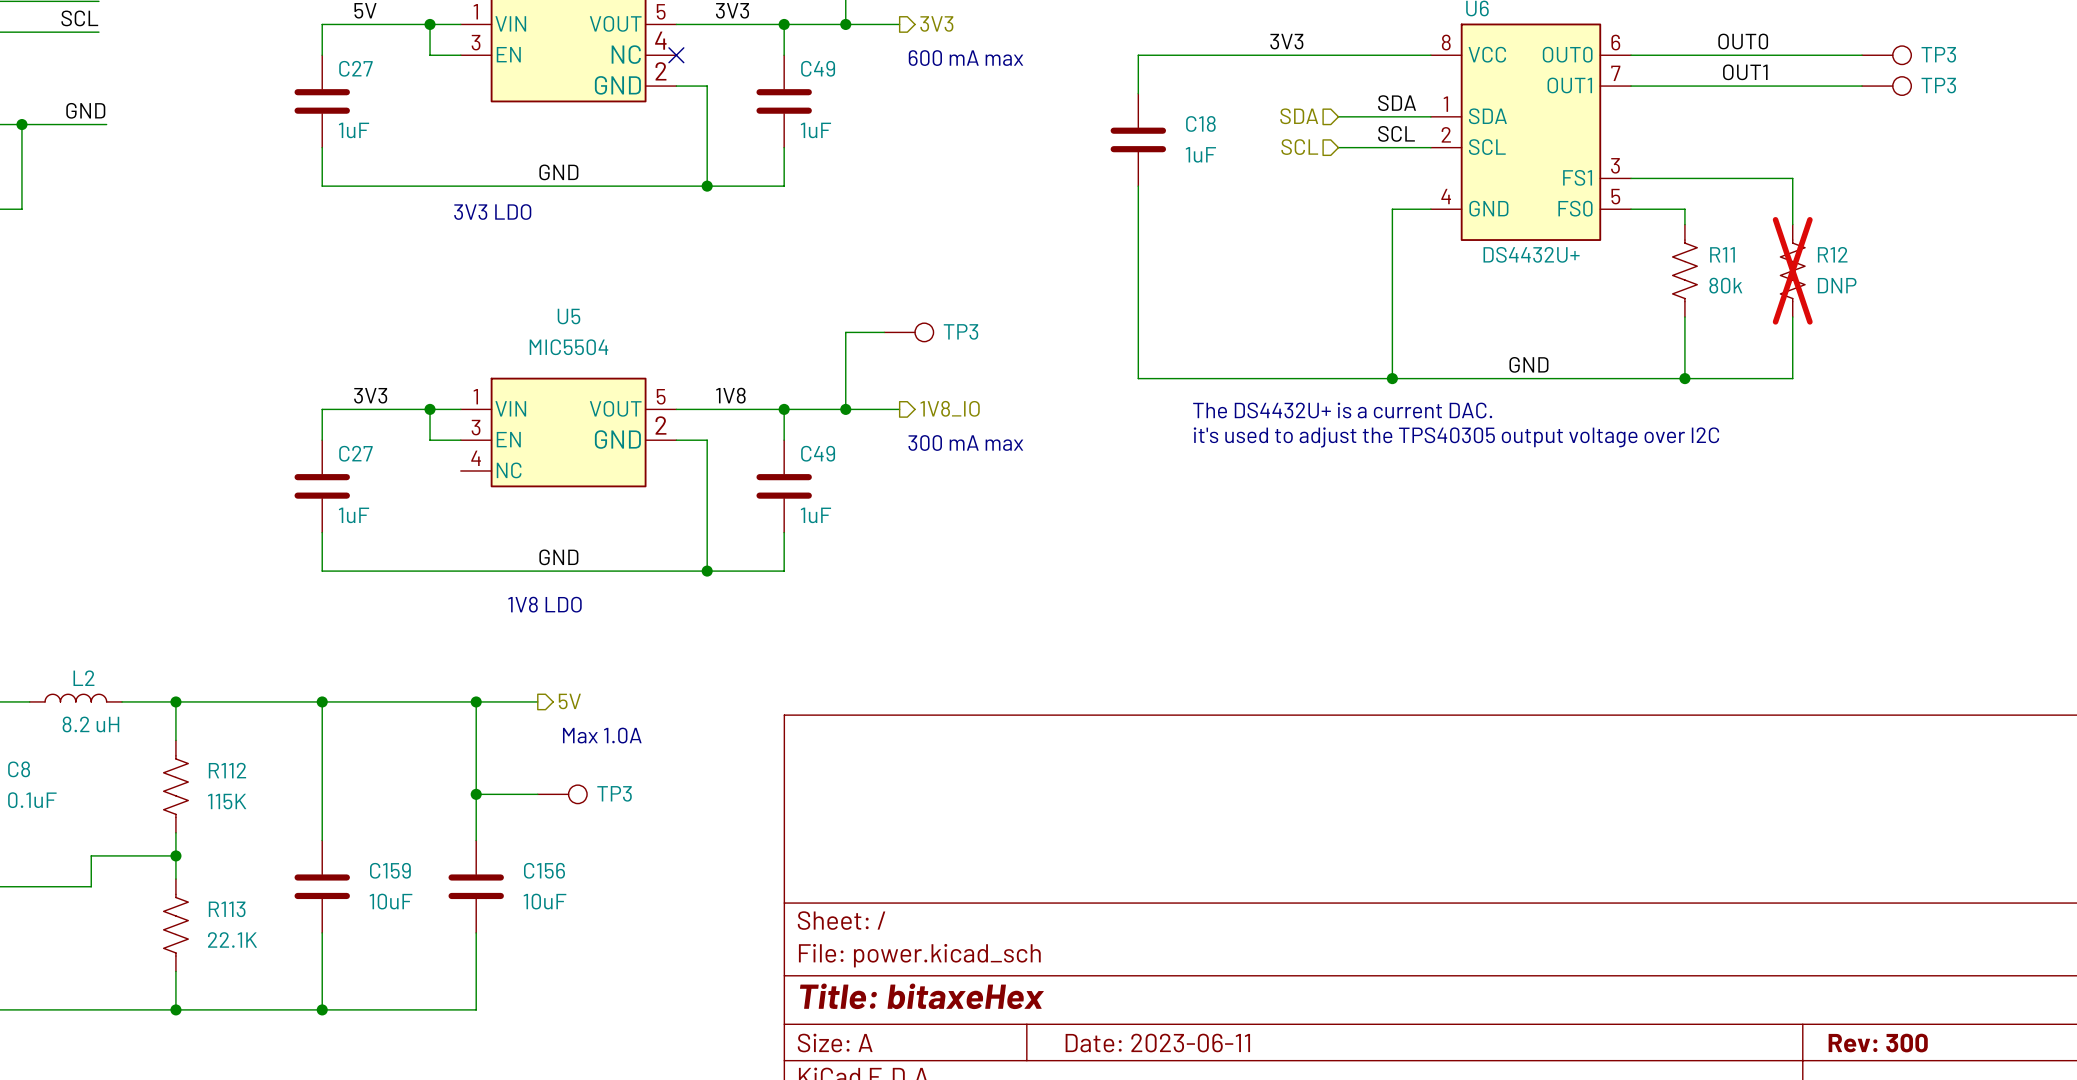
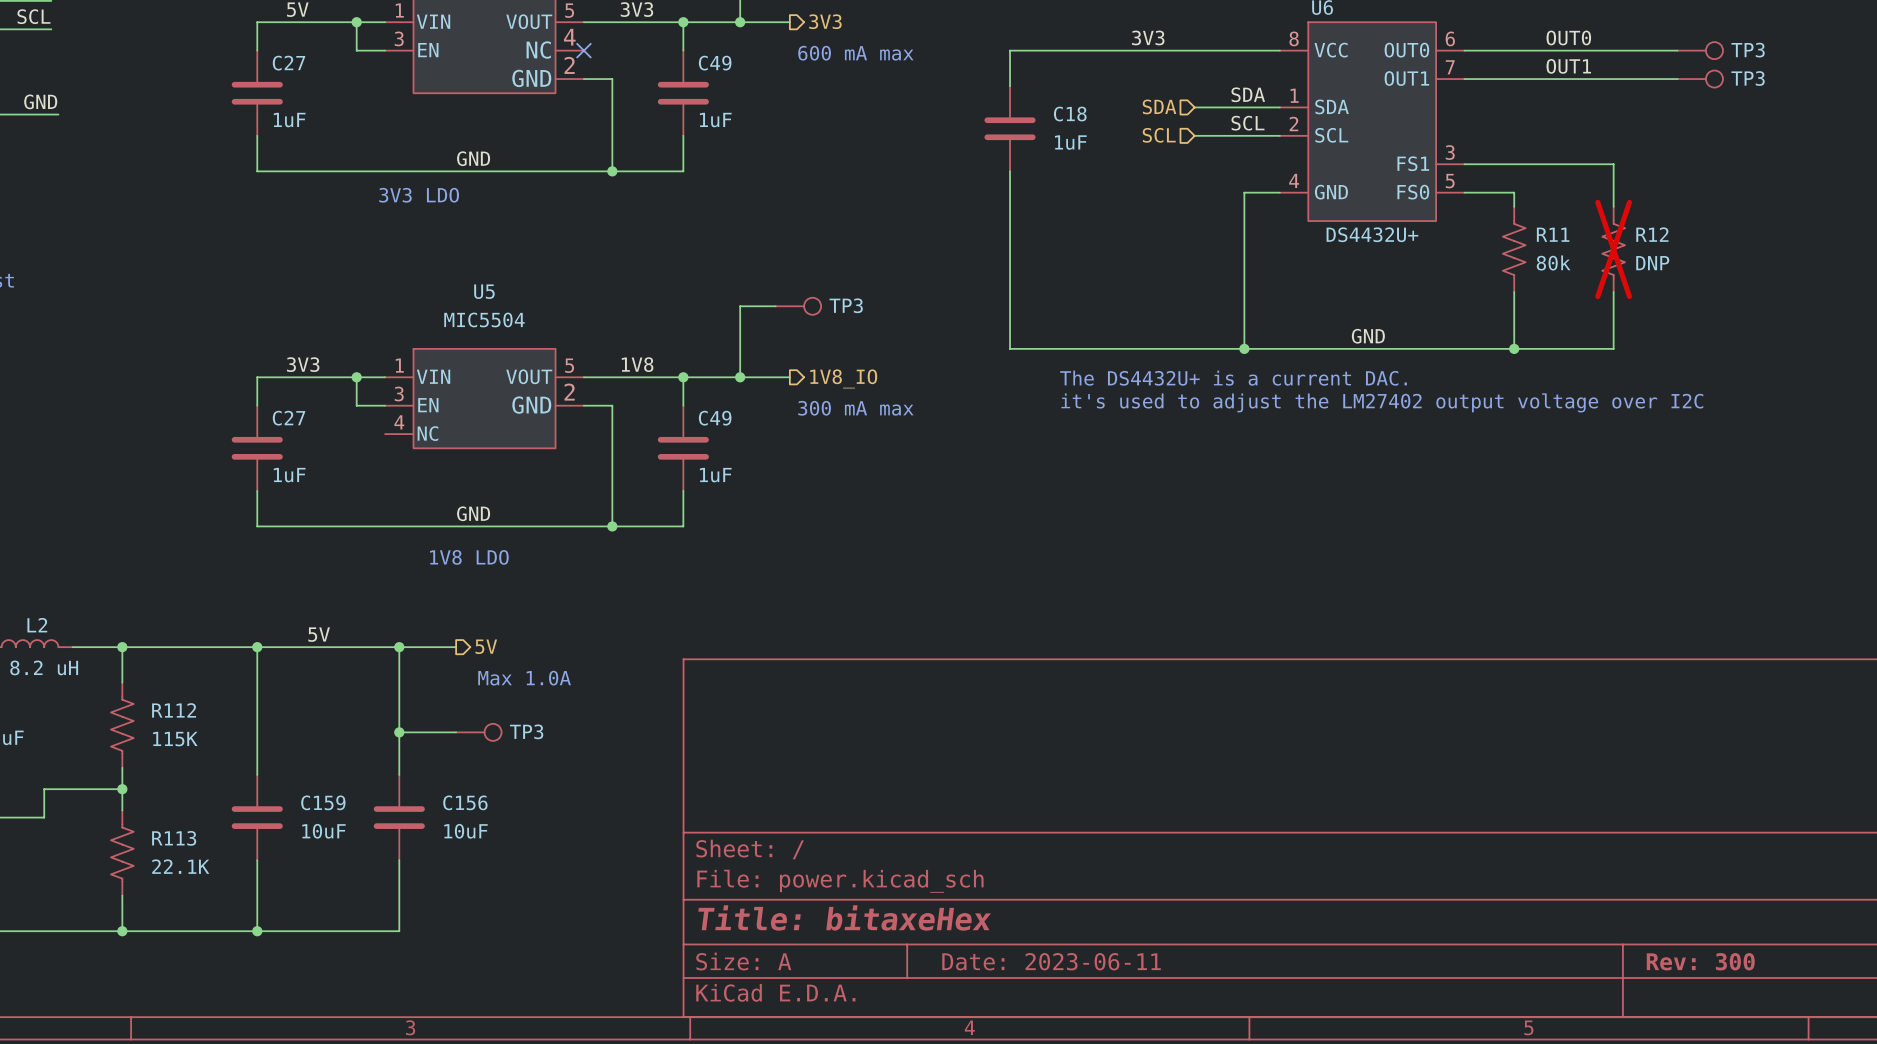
text: it's used to adjust the TPS40305 output voltage over I2C (1456, 437) -> it's used to adjust the LM27402 output voltage over I2C (1382, 402)
label: none -> 5V (319, 634)

